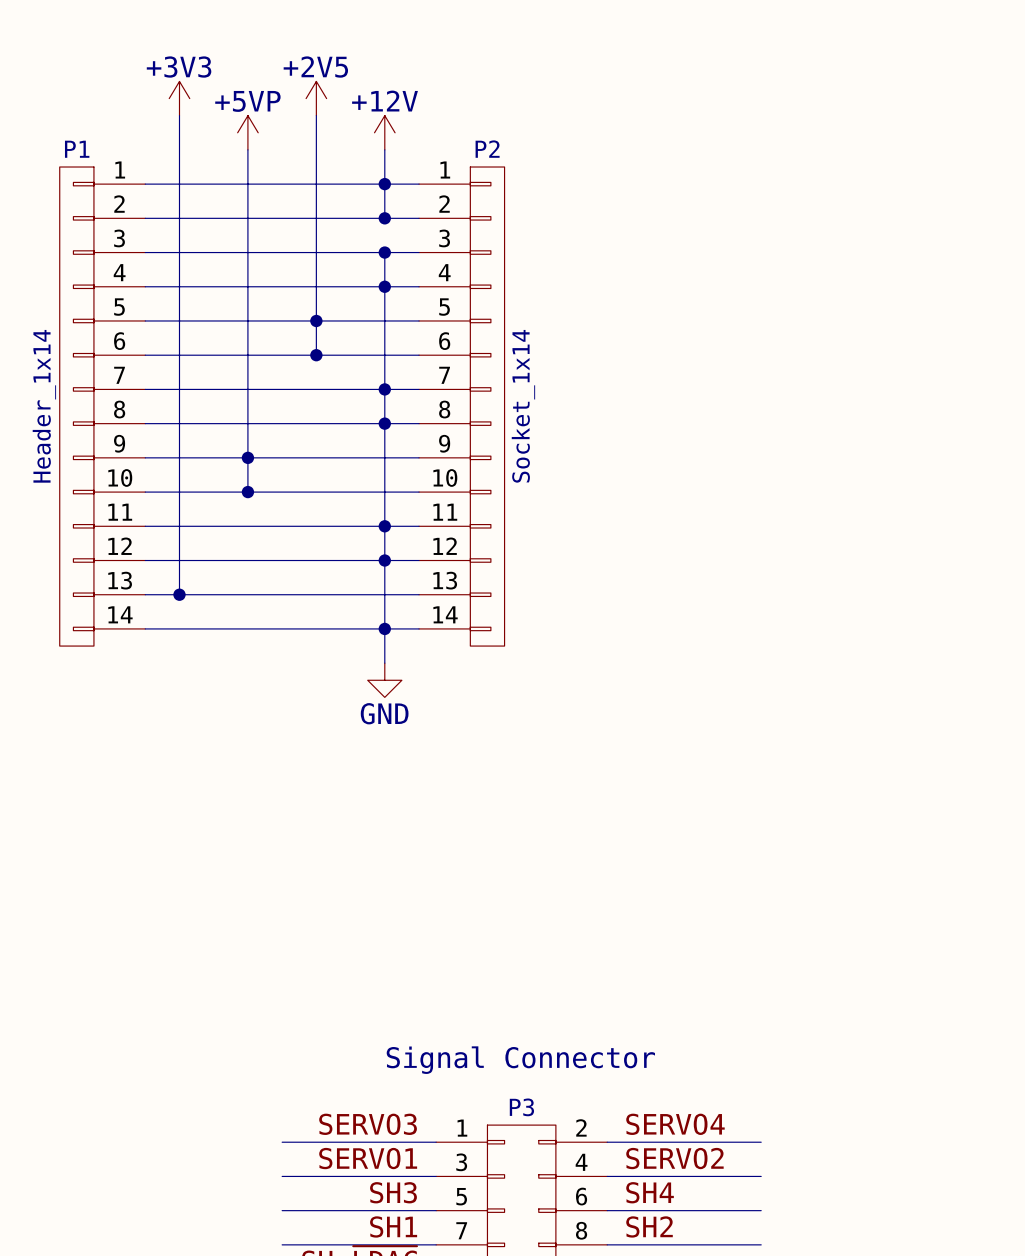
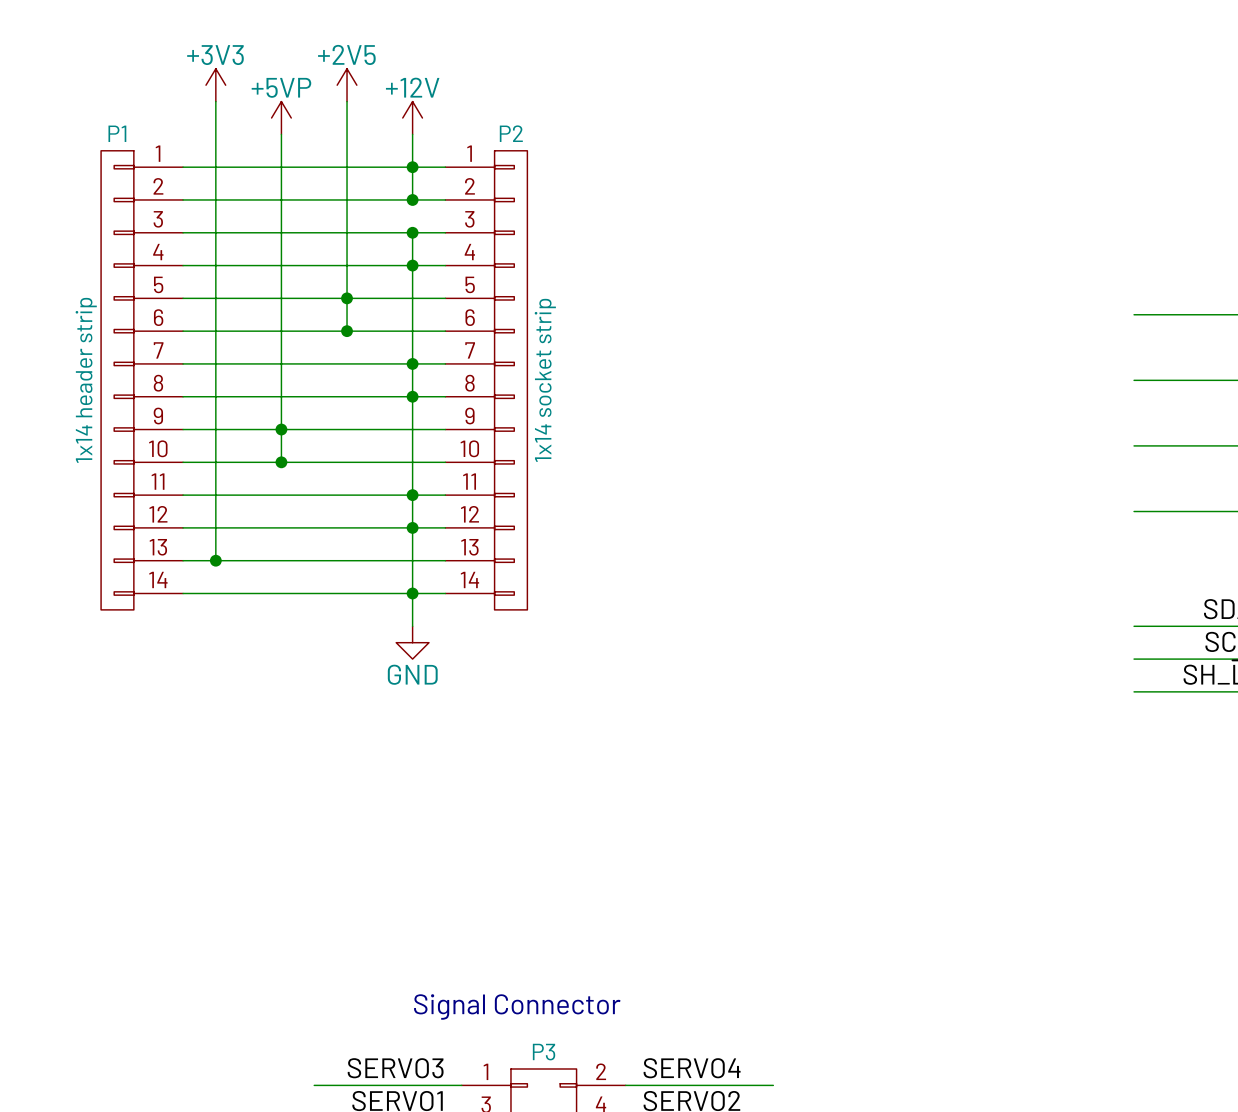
P1 value: Header_1x14 (44, 406) -> 1x14 header strip (86, 380)
P2 value: Socket_1x14 (523, 406) -> 1x14 socket strip (545, 380)

